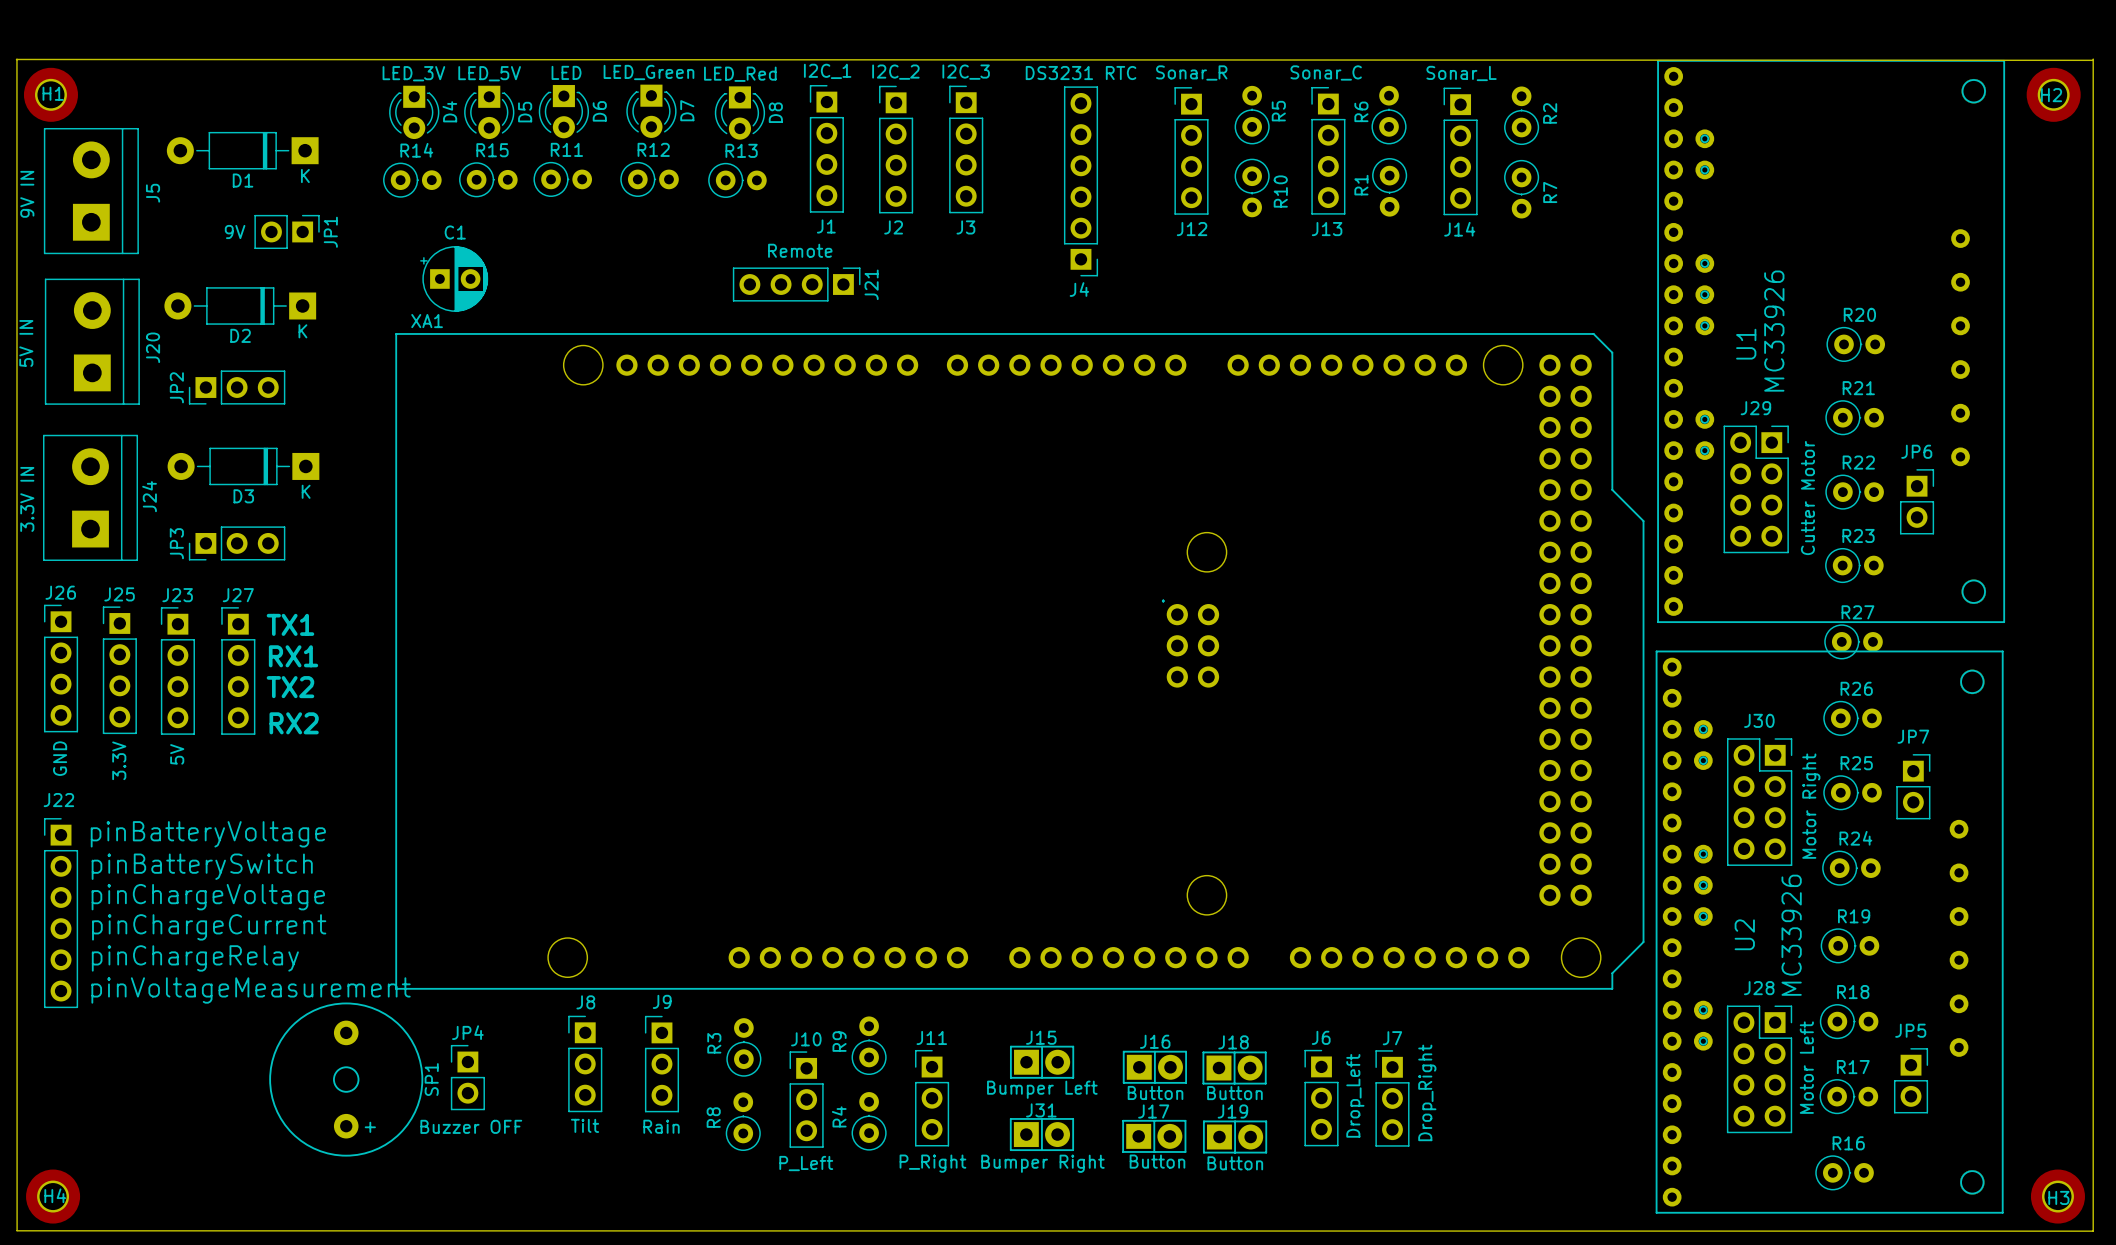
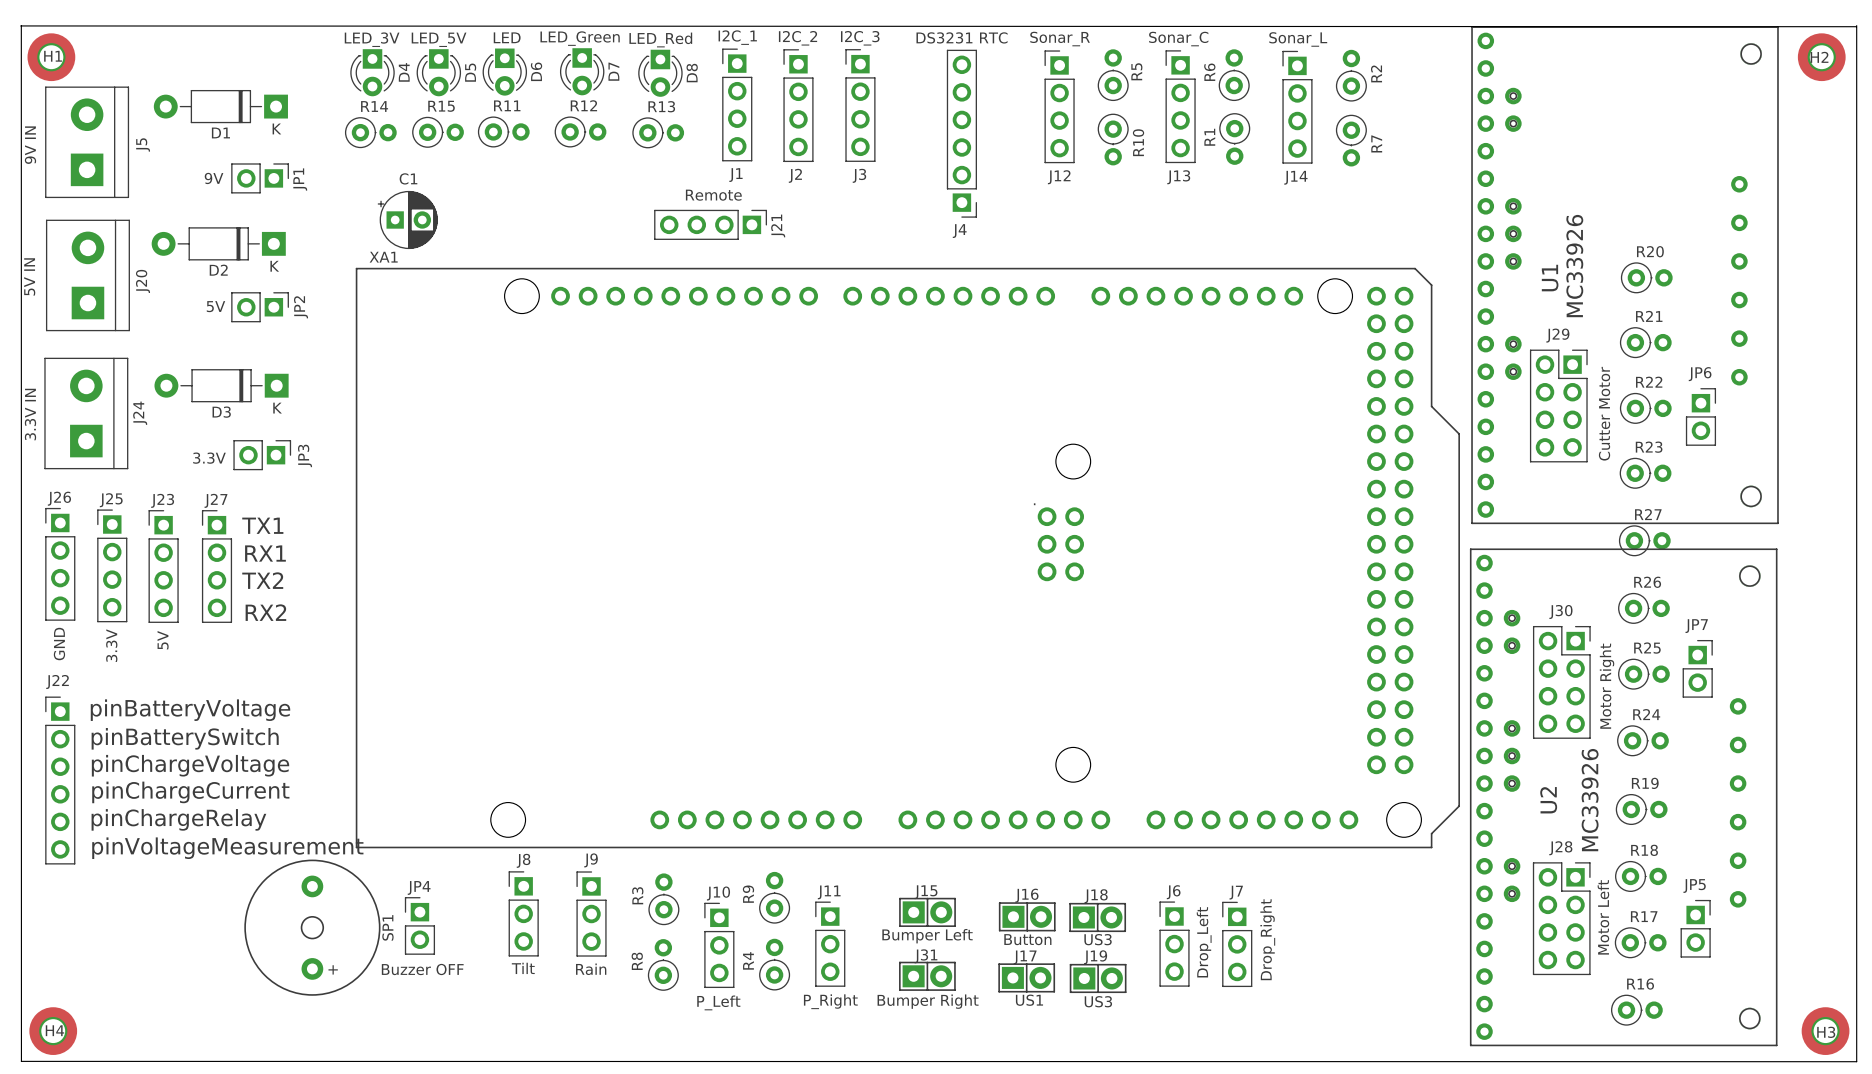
JP2 footprint: [188, 370, 286, 405] -> [231, 292, 289, 323]
JP2 value: none -> 5V (215, 306)
JP2 name position: JP2 (176, 387) -> JP2 (301, 307)
JP3 footprint: [188, 526, 286, 561] -> [233, 440, 292, 471]
JP3 name position: JP3 (176, 543) -> JP3 (305, 455)
JP3 value: none -> 3.3V (209, 458)
J18 value: Button (1234, 1093) -> US3 (1098, 939)
J17 value: Button (1157, 1161) -> US1 (1029, 1000)
J19 value: Button (1235, 1163) -> US3 (1098, 1001)

